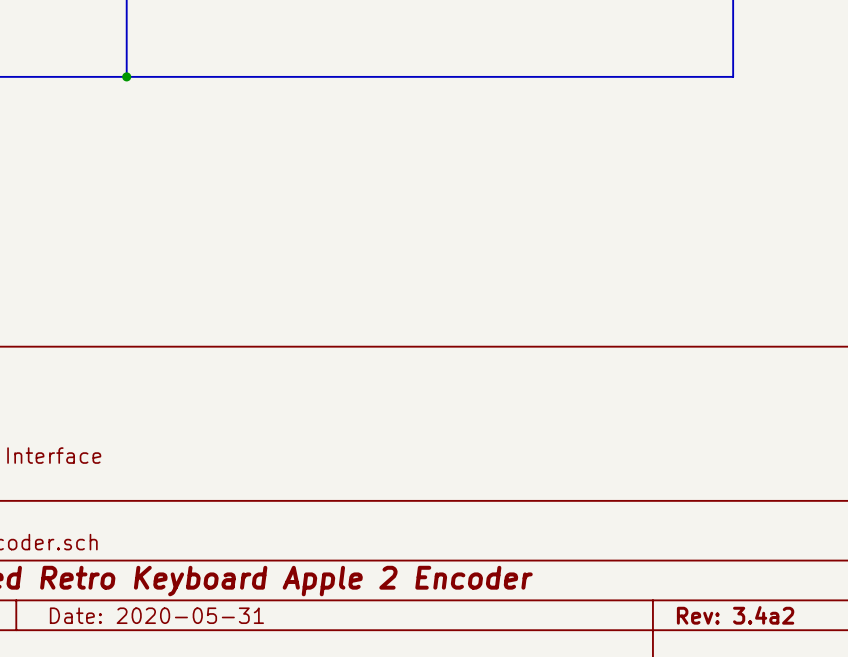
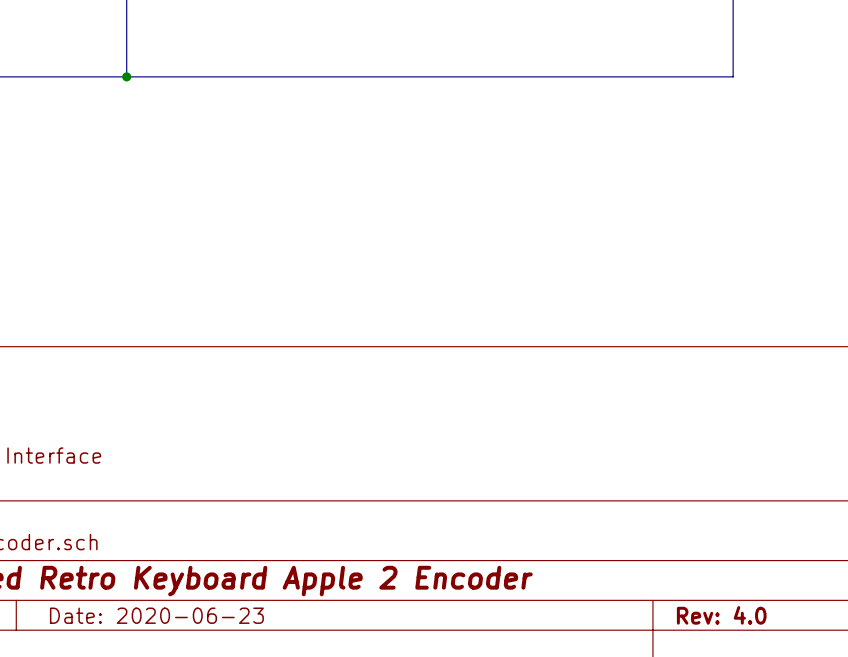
title block: Date: 2020-05-31 (156, 615) -> Date: 2020-06-23 (156, 615)
title block: Rev: 3.4a2 (735, 615) -> Rev: 4.0 (721, 615)

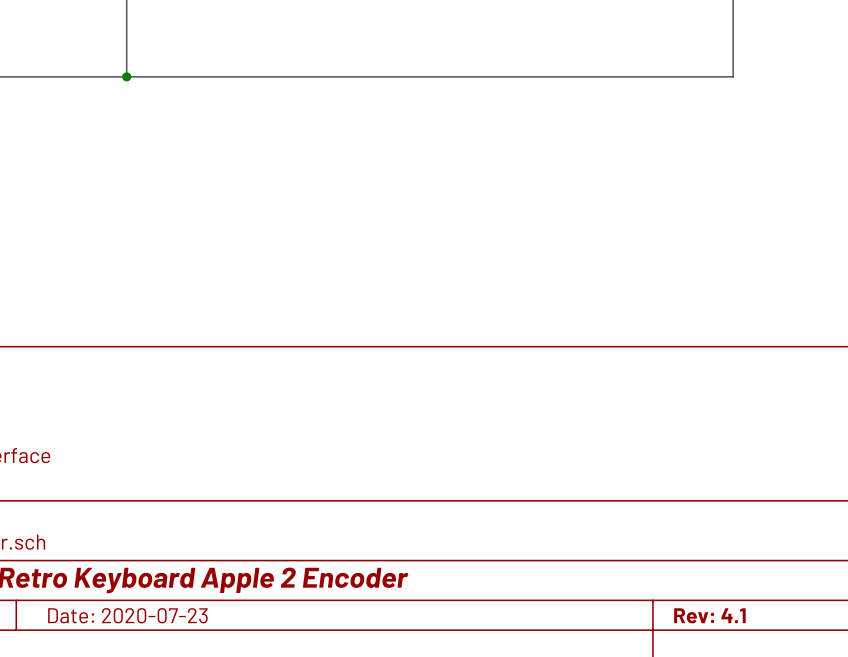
title block: Date: 2020-06-23 (156, 615) -> Date: 2020-07-23 (127, 615)
title block: Rev: 4.0 (721, 615) -> Rev: 4.1 (709, 615)

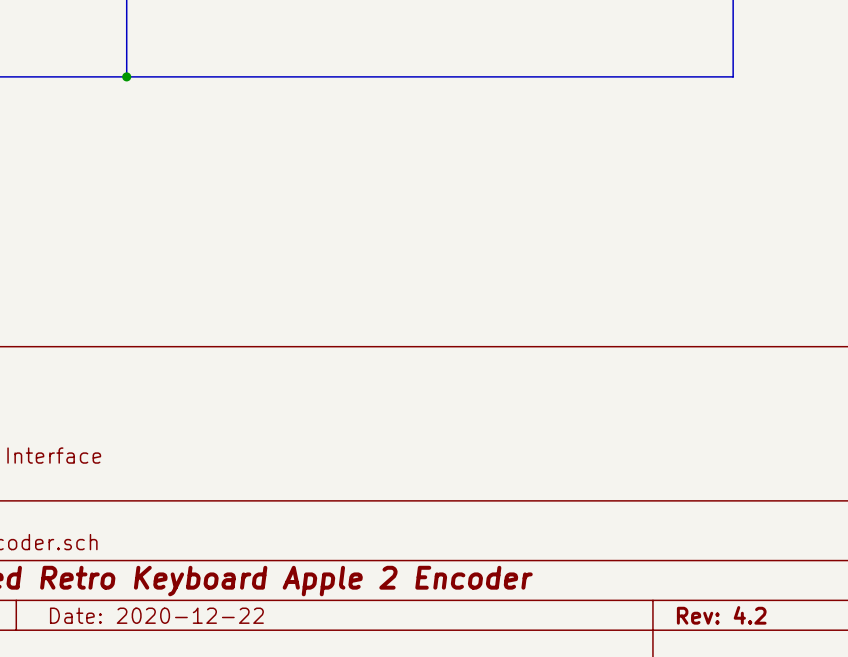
title block: Date: 2020-07-23 (127, 615) -> Date: 2020-12-22 (156, 615)
title block: Rev: 4.1 (709, 615) -> Rev: 4.2 (721, 615)

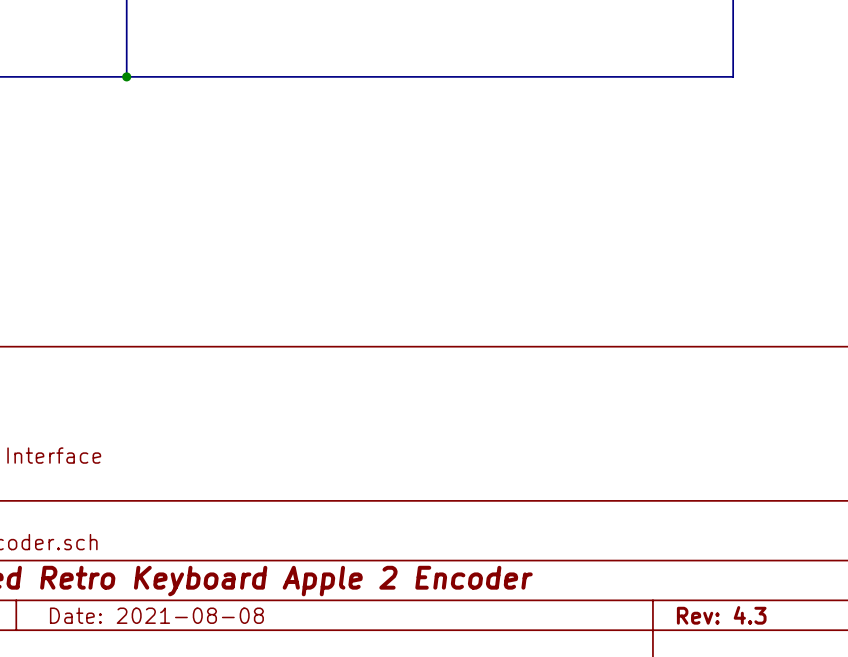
title block: Date: 2020-12-22 (156, 615) -> Date: 2021-08-08 (156, 615)
title block: Rev: 4.2 (721, 615) -> Rev: 4.3 (721, 615)

